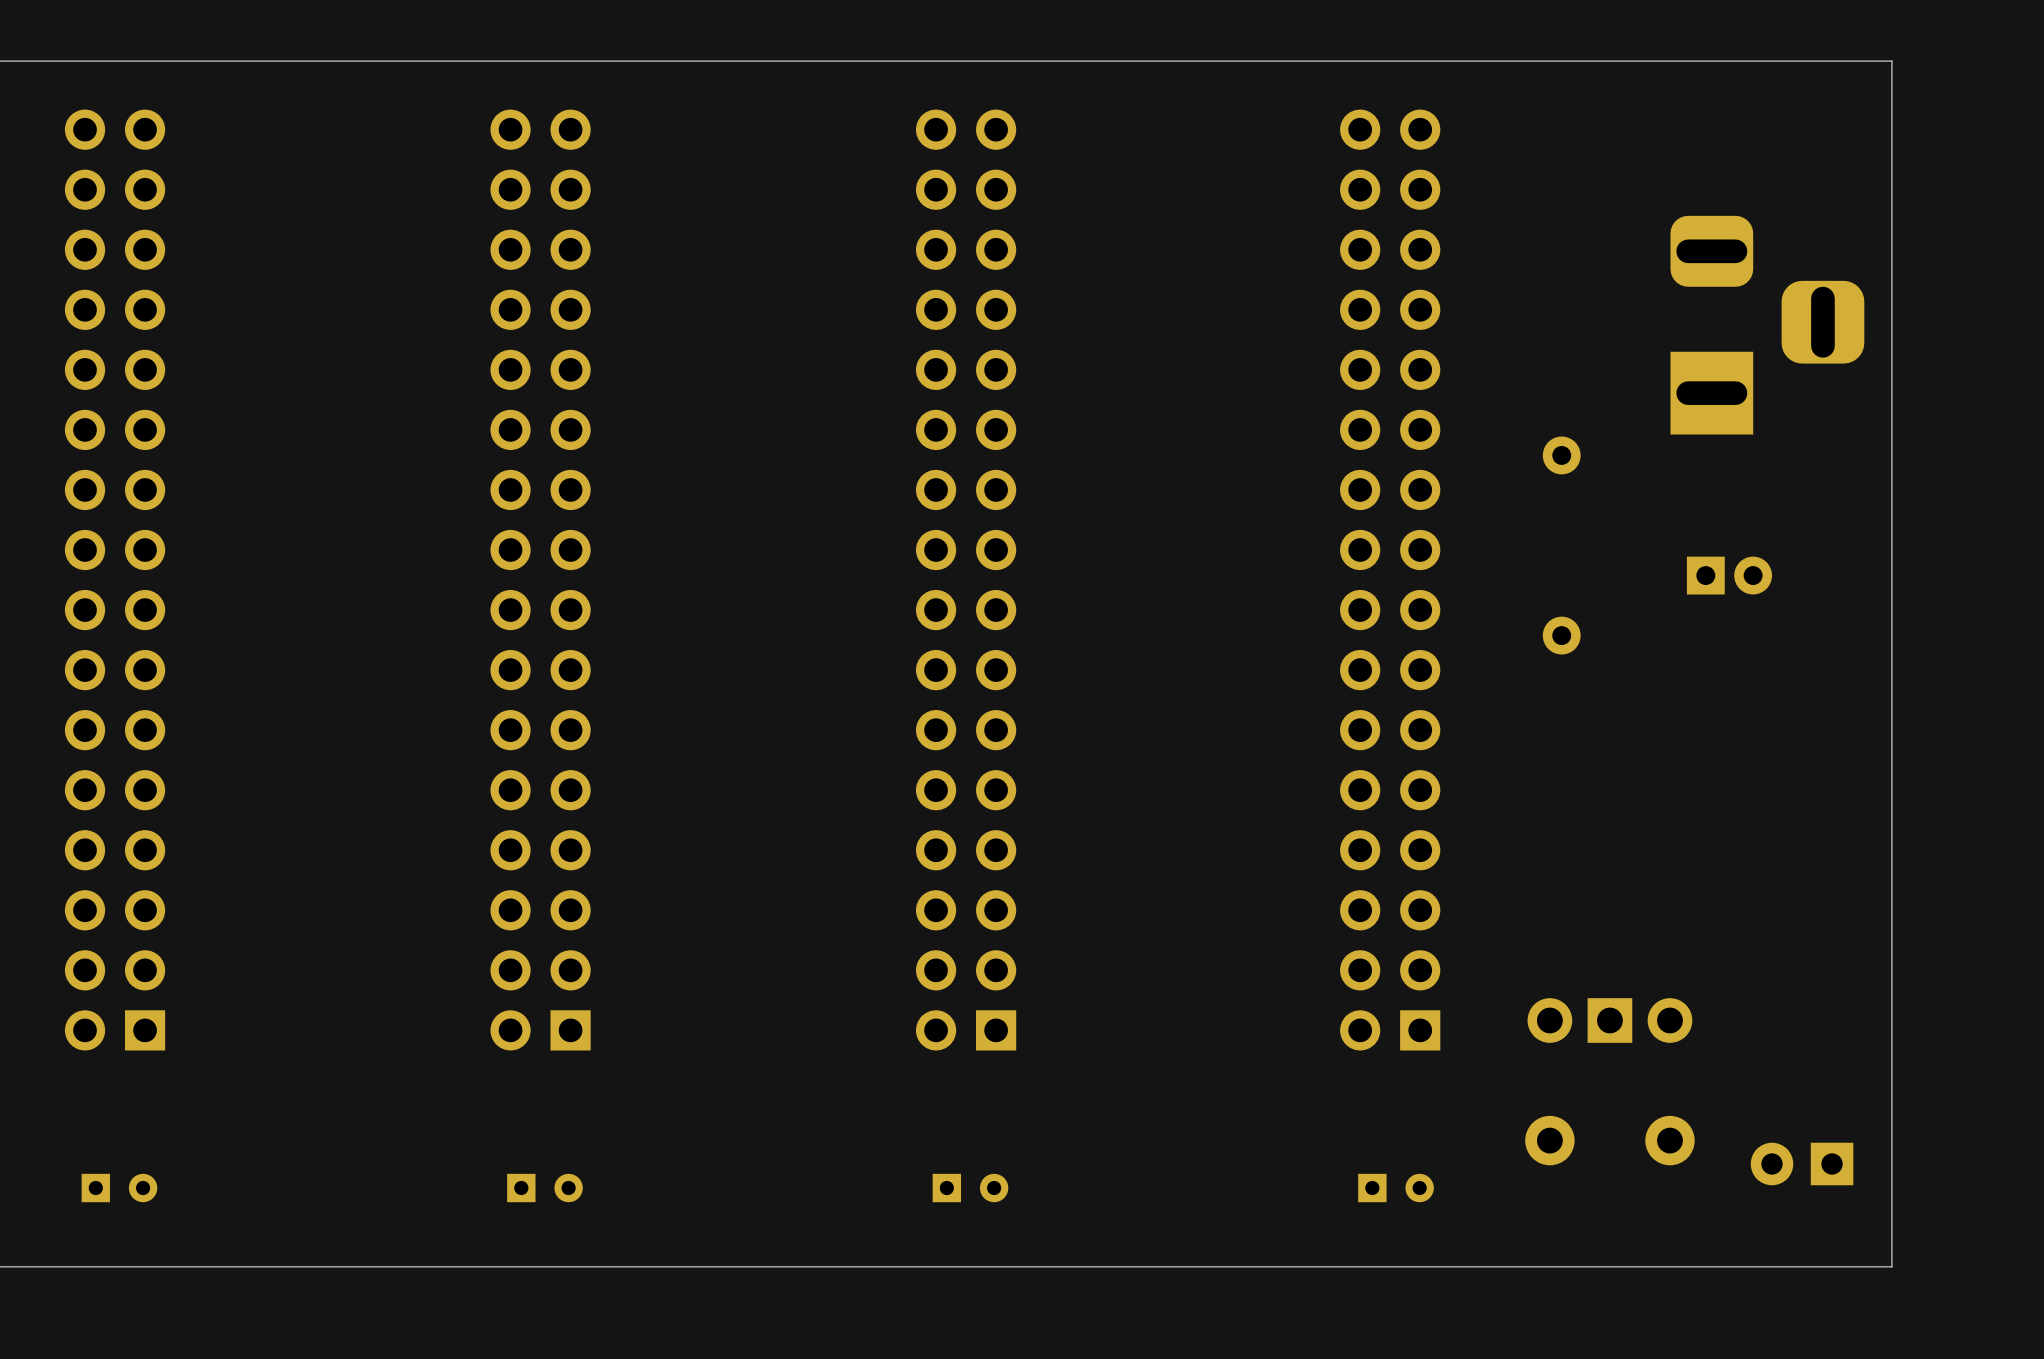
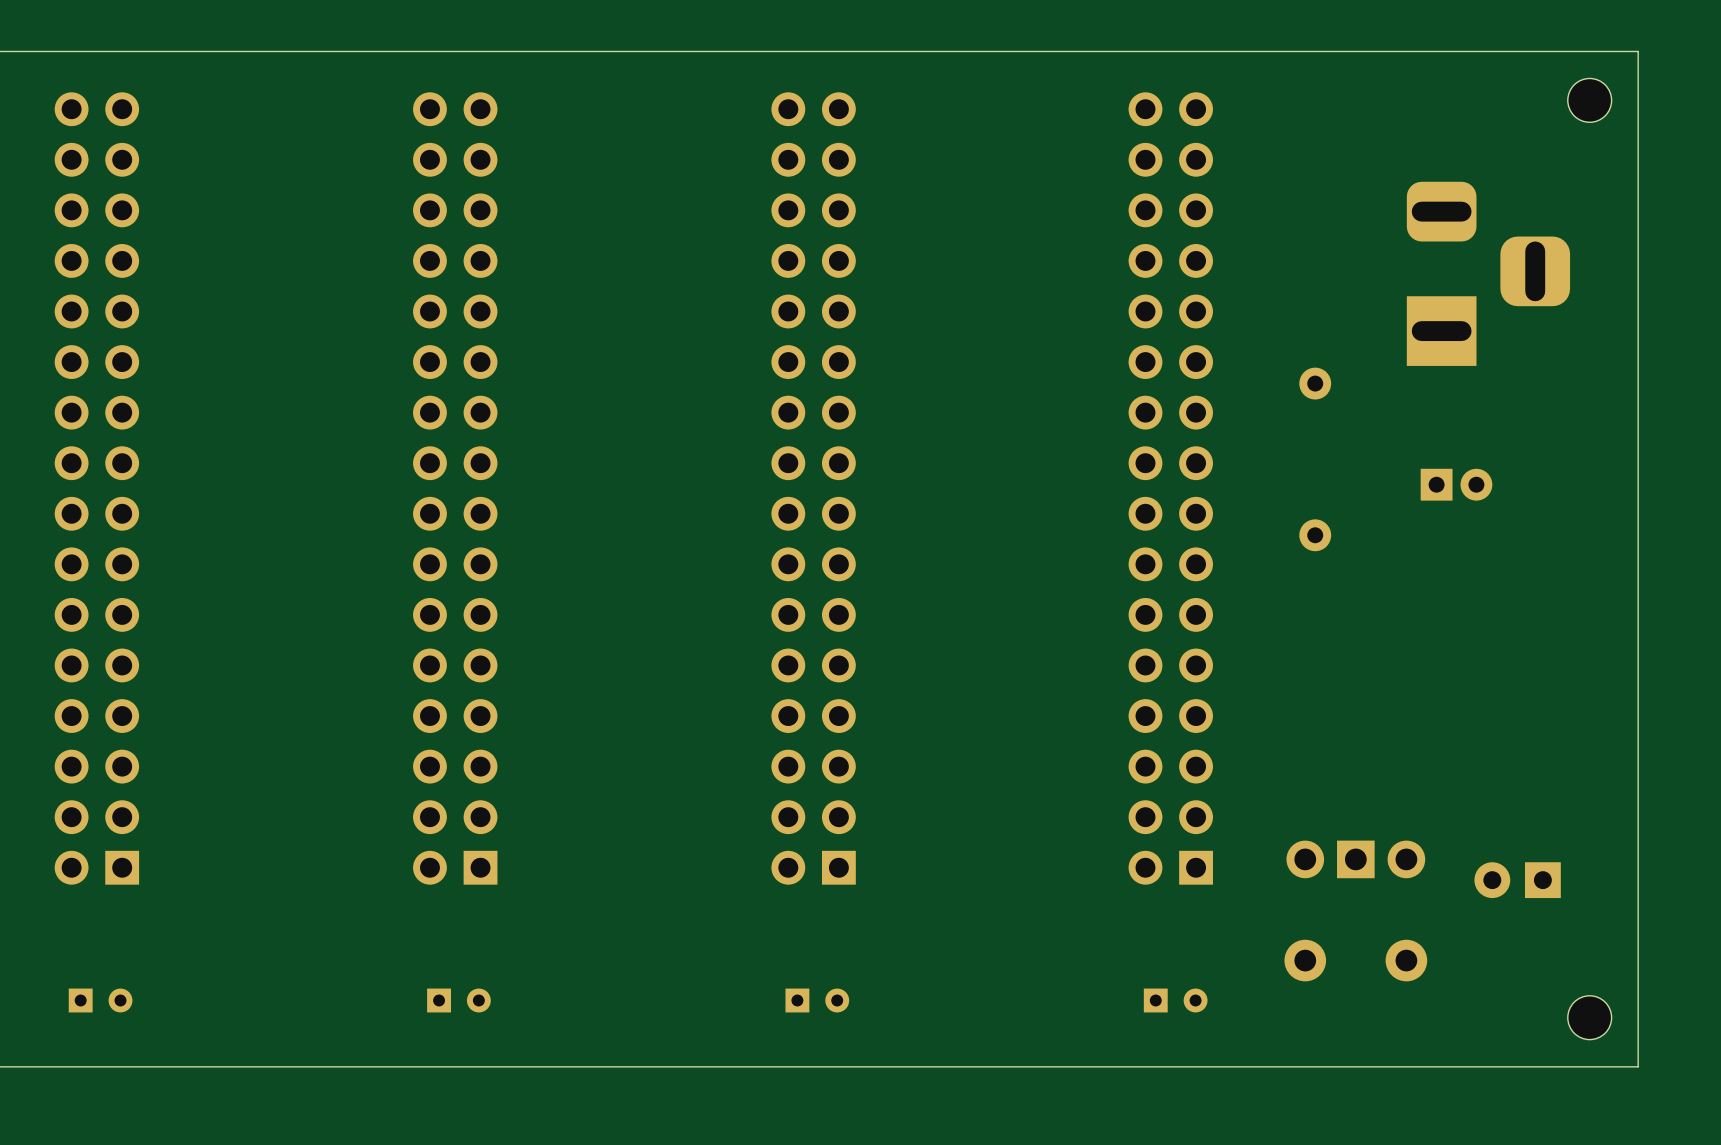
board edge: (1891, 61) (1891, 1266) -> (1593, 51) (1638, 51) (1638, 1066) (1593, 1066)
part: none -> (1589, 100)
part position: (1802, 1163) -> (1517, 880)
part: none -> (1589, 1017)

